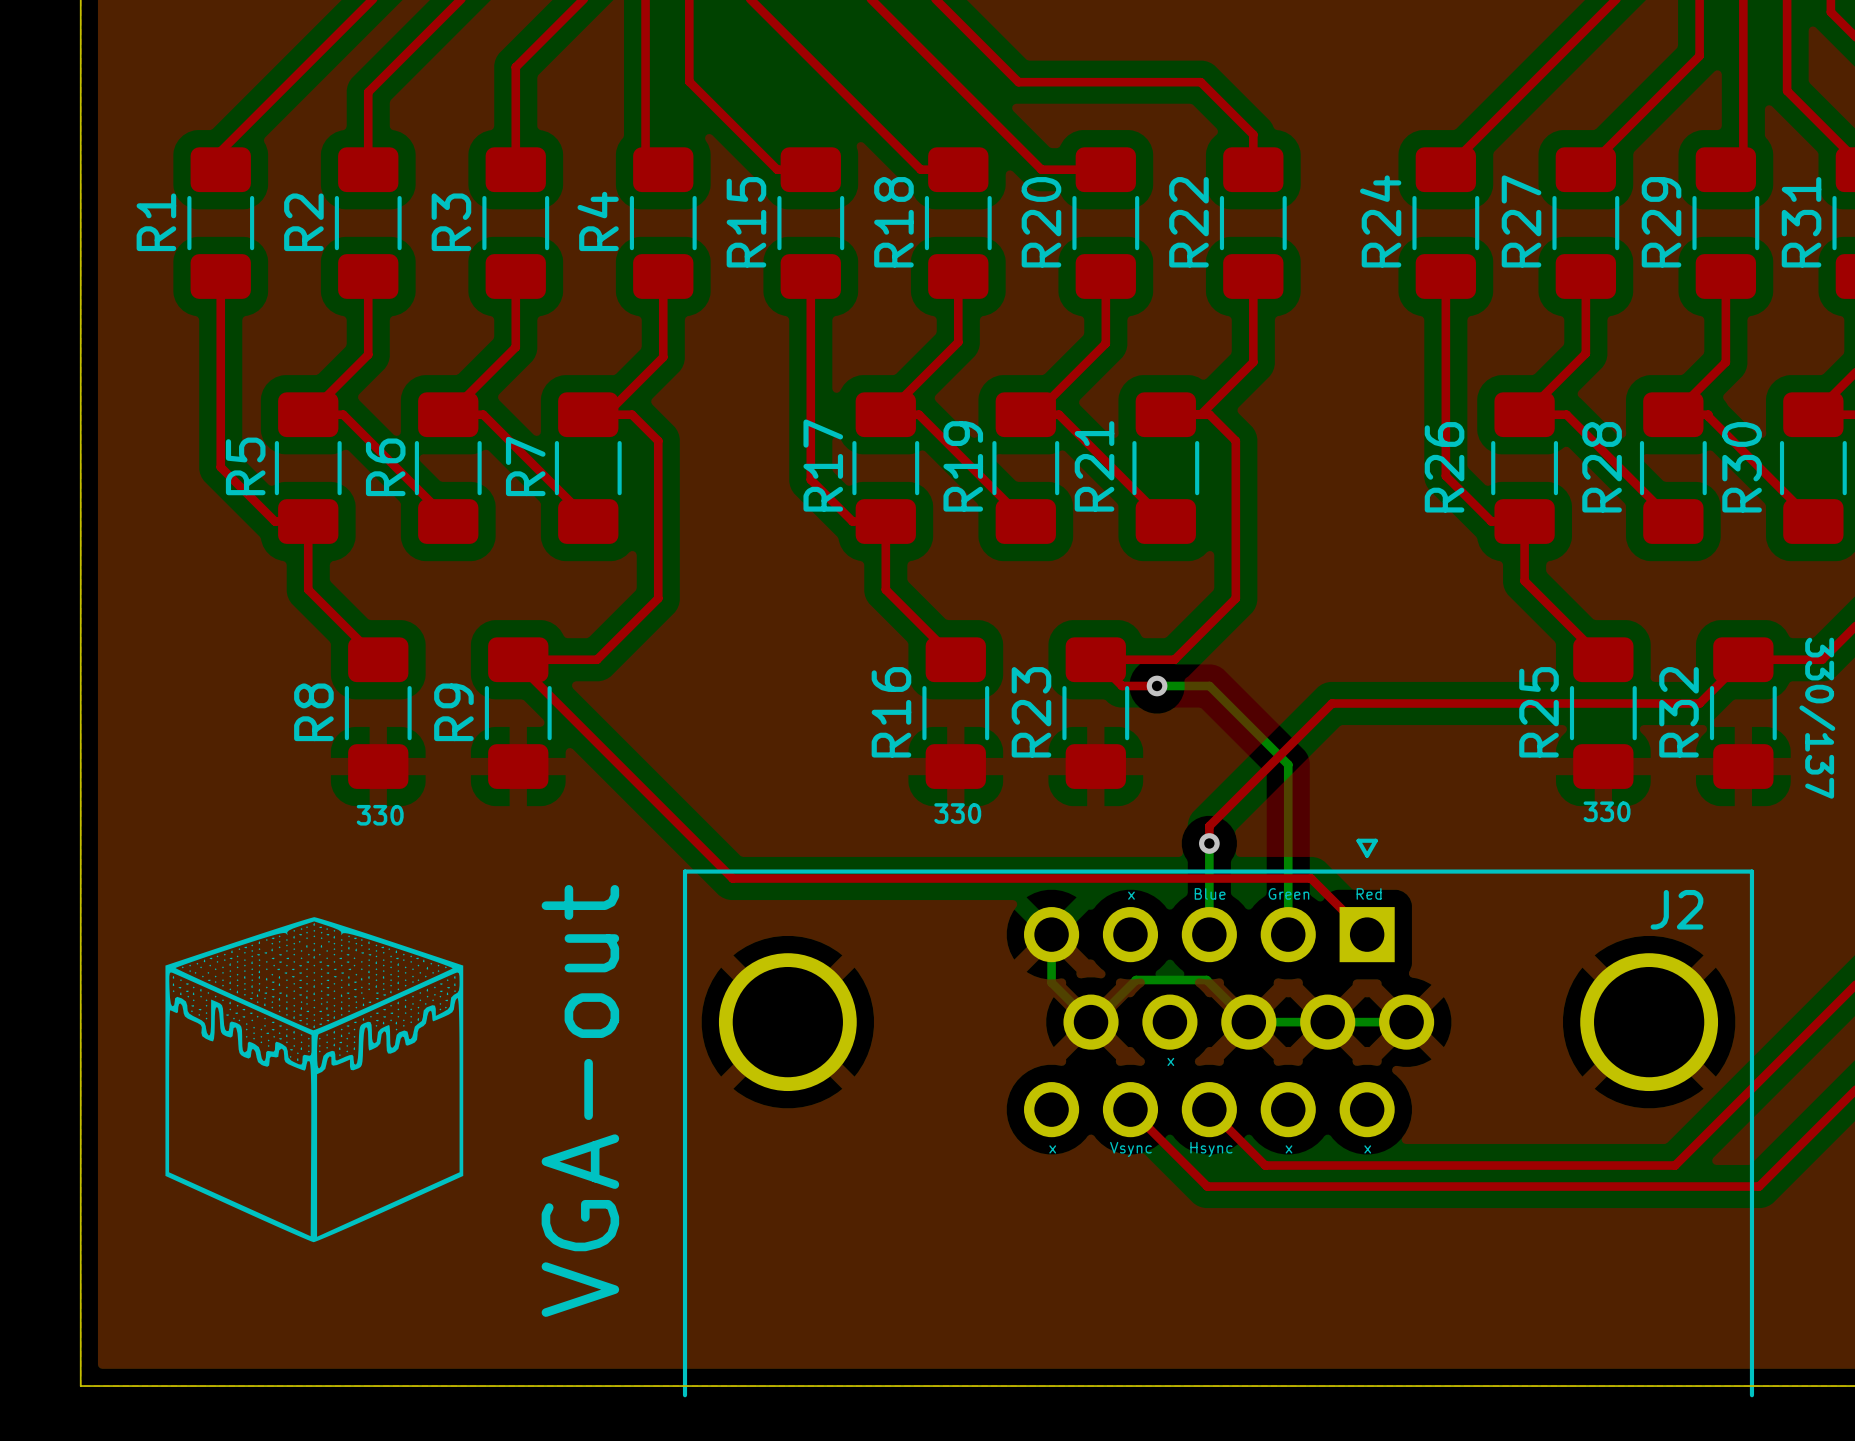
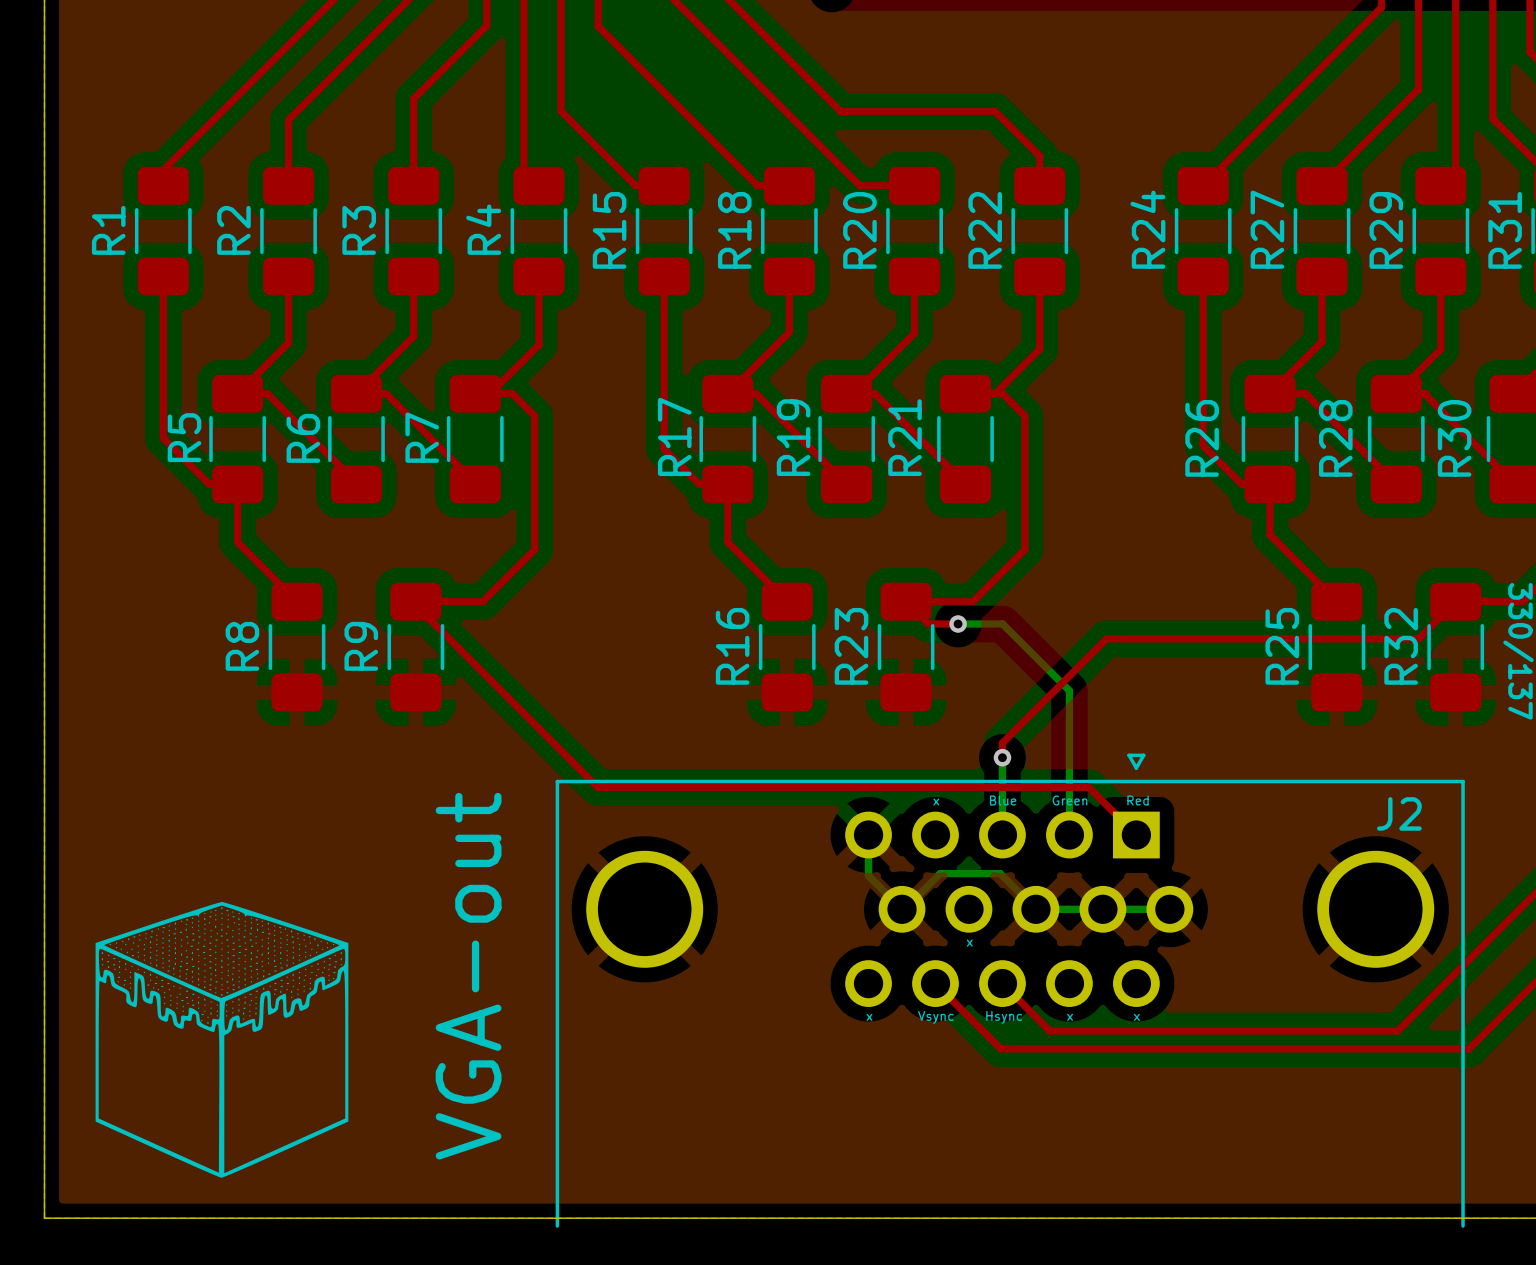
text: 330 (1607, 811) -> none
text: 330 (957, 813) -> none
text: 330 (380, 815) -> none
drawing position: (314, 1079) -> (221, 1039)

